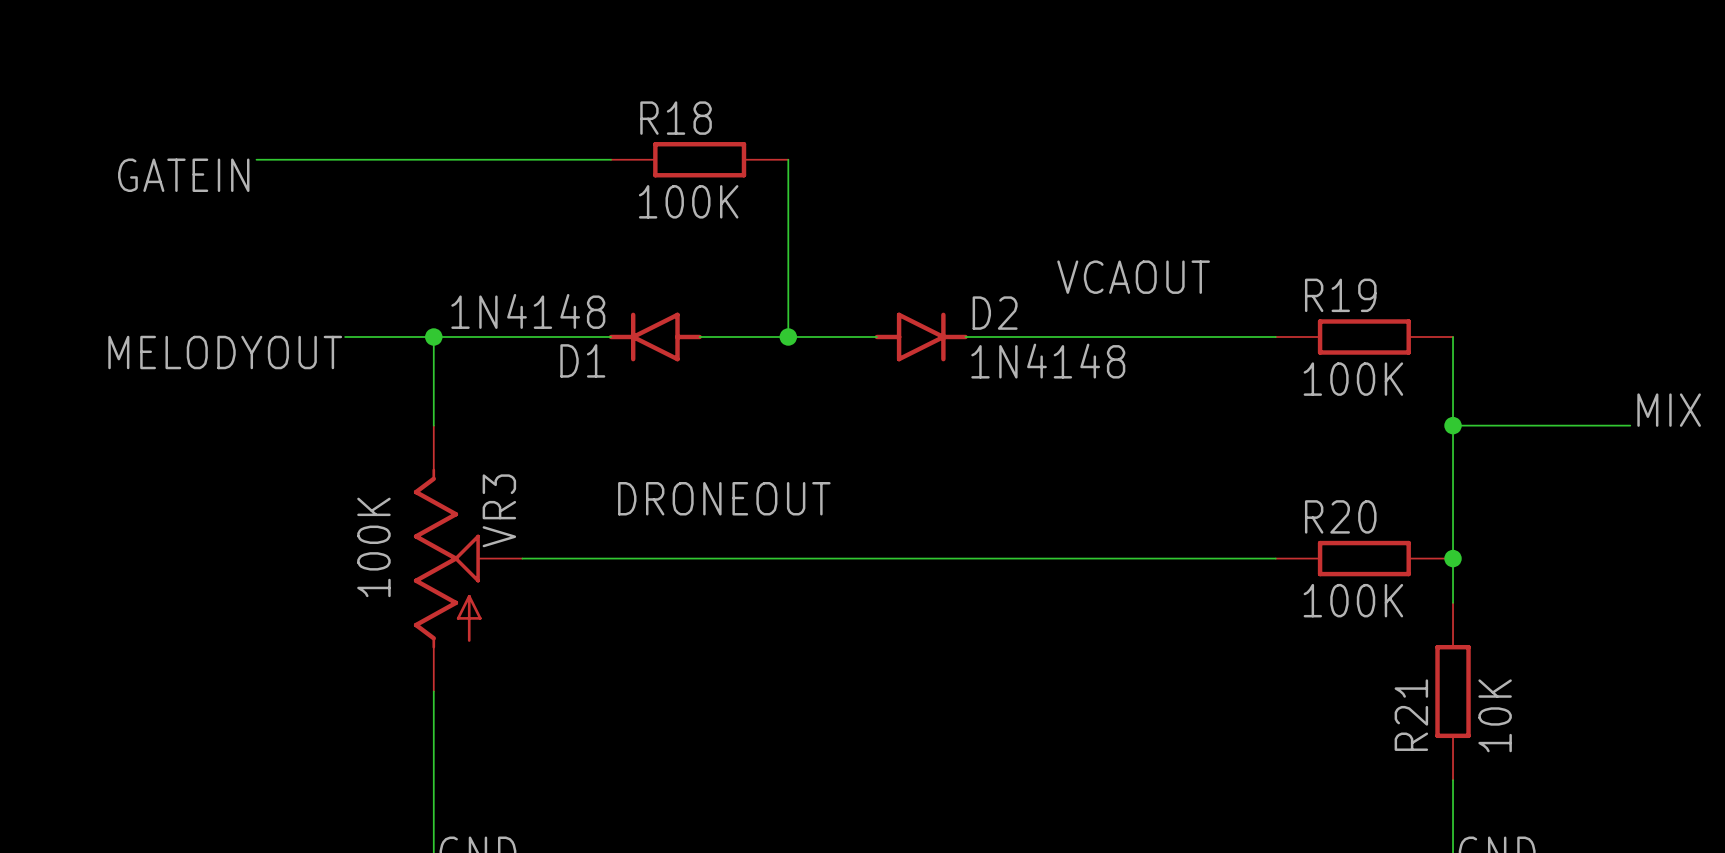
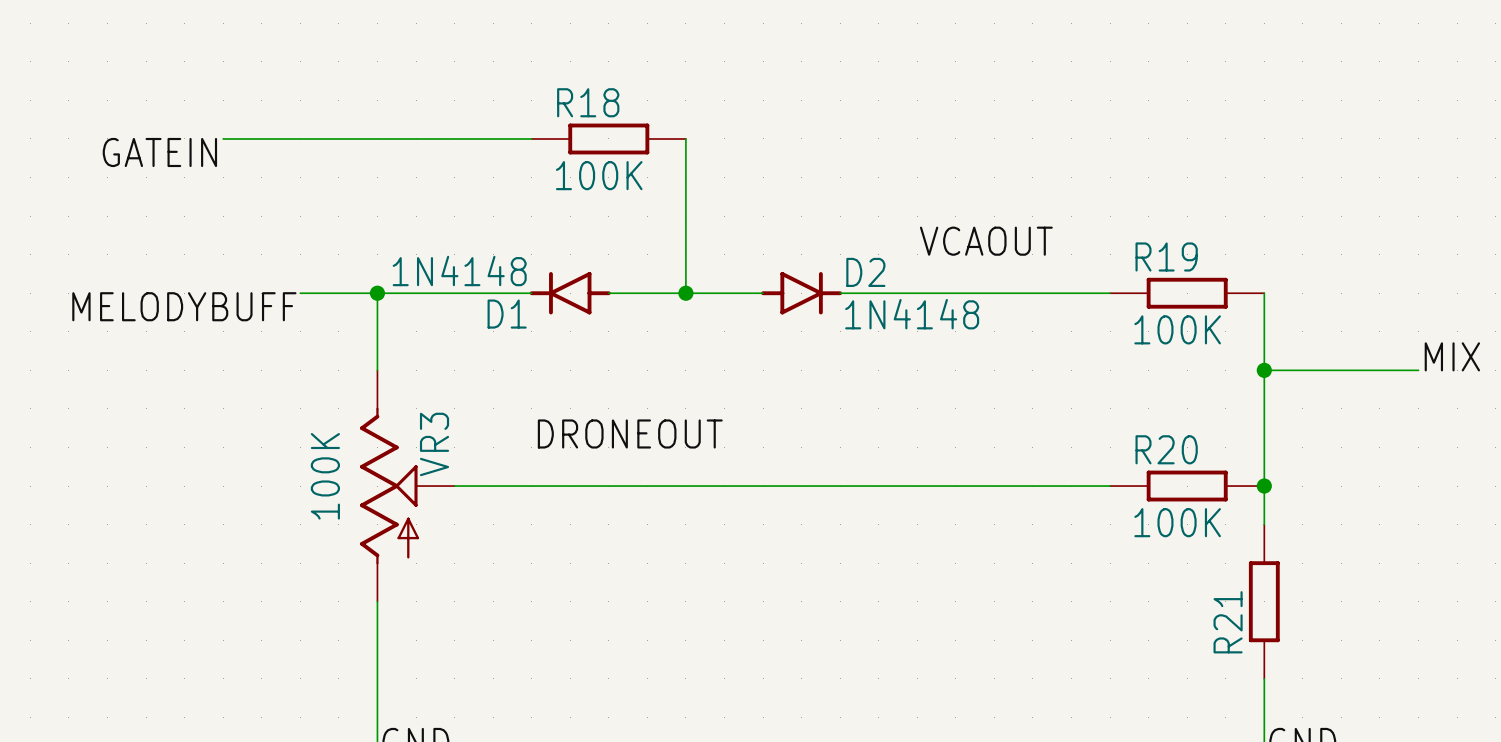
label: MELODYOUT (225, 352) -> MELODYBUFF (184, 306)
R21 value: 10K (1495, 715) -> none

